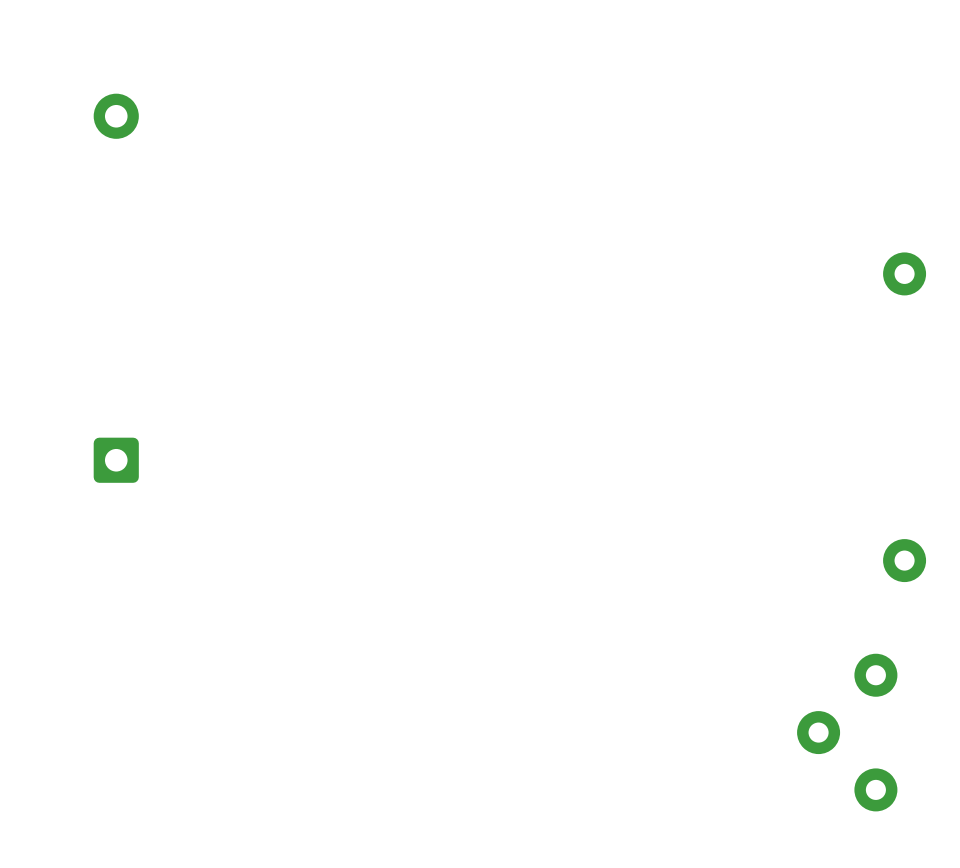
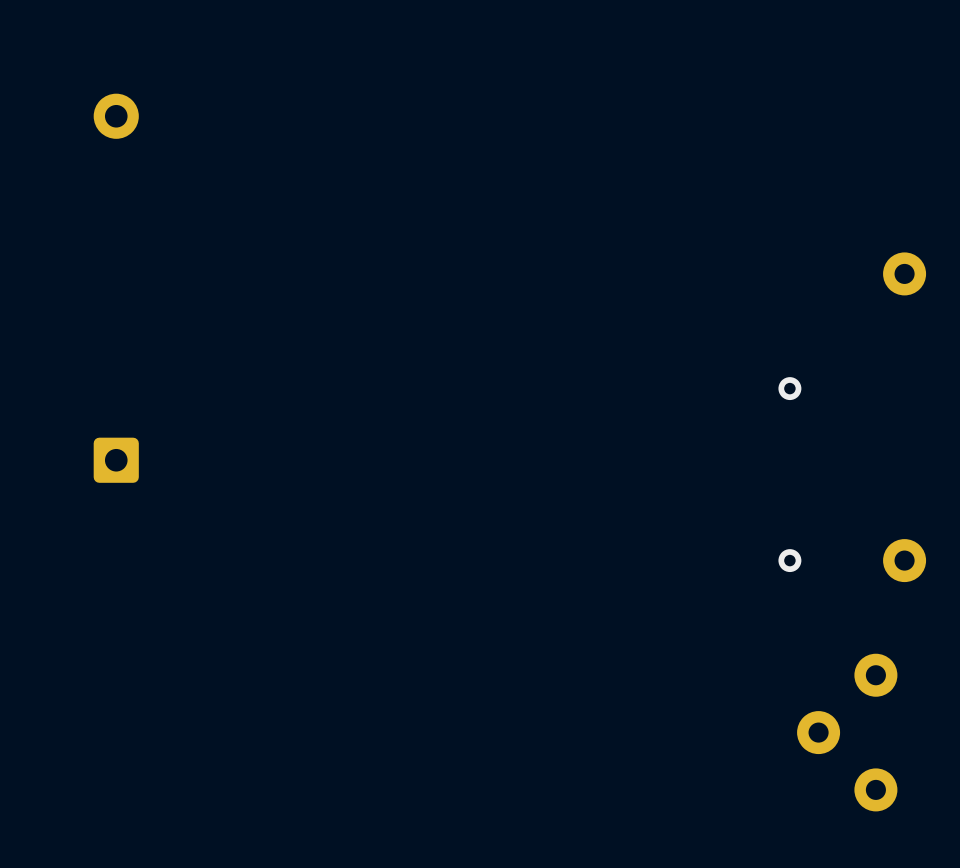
via: none -> (789, 388)
via: none -> (789, 560)

